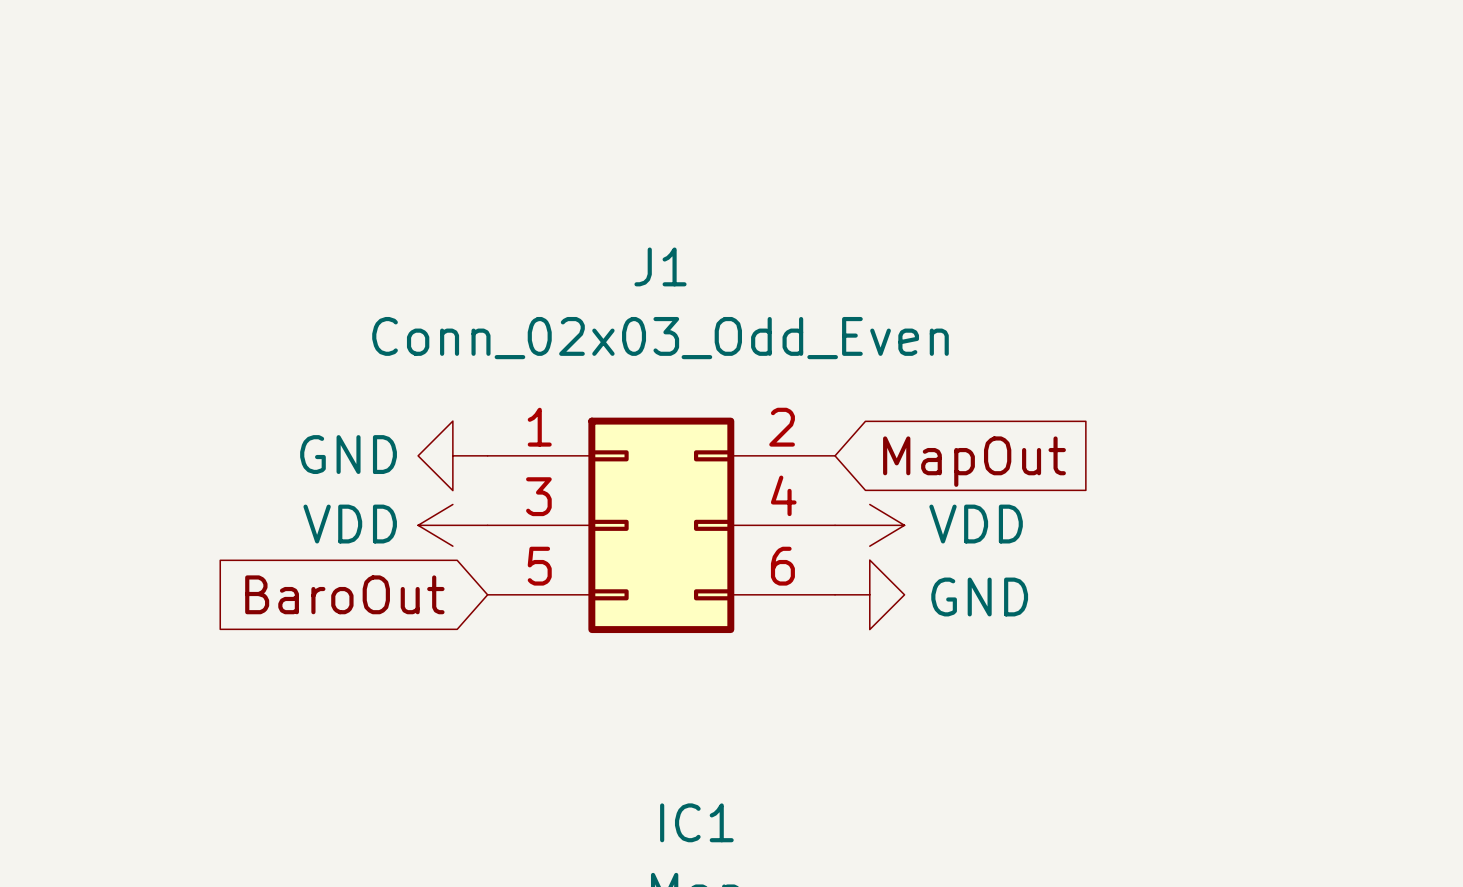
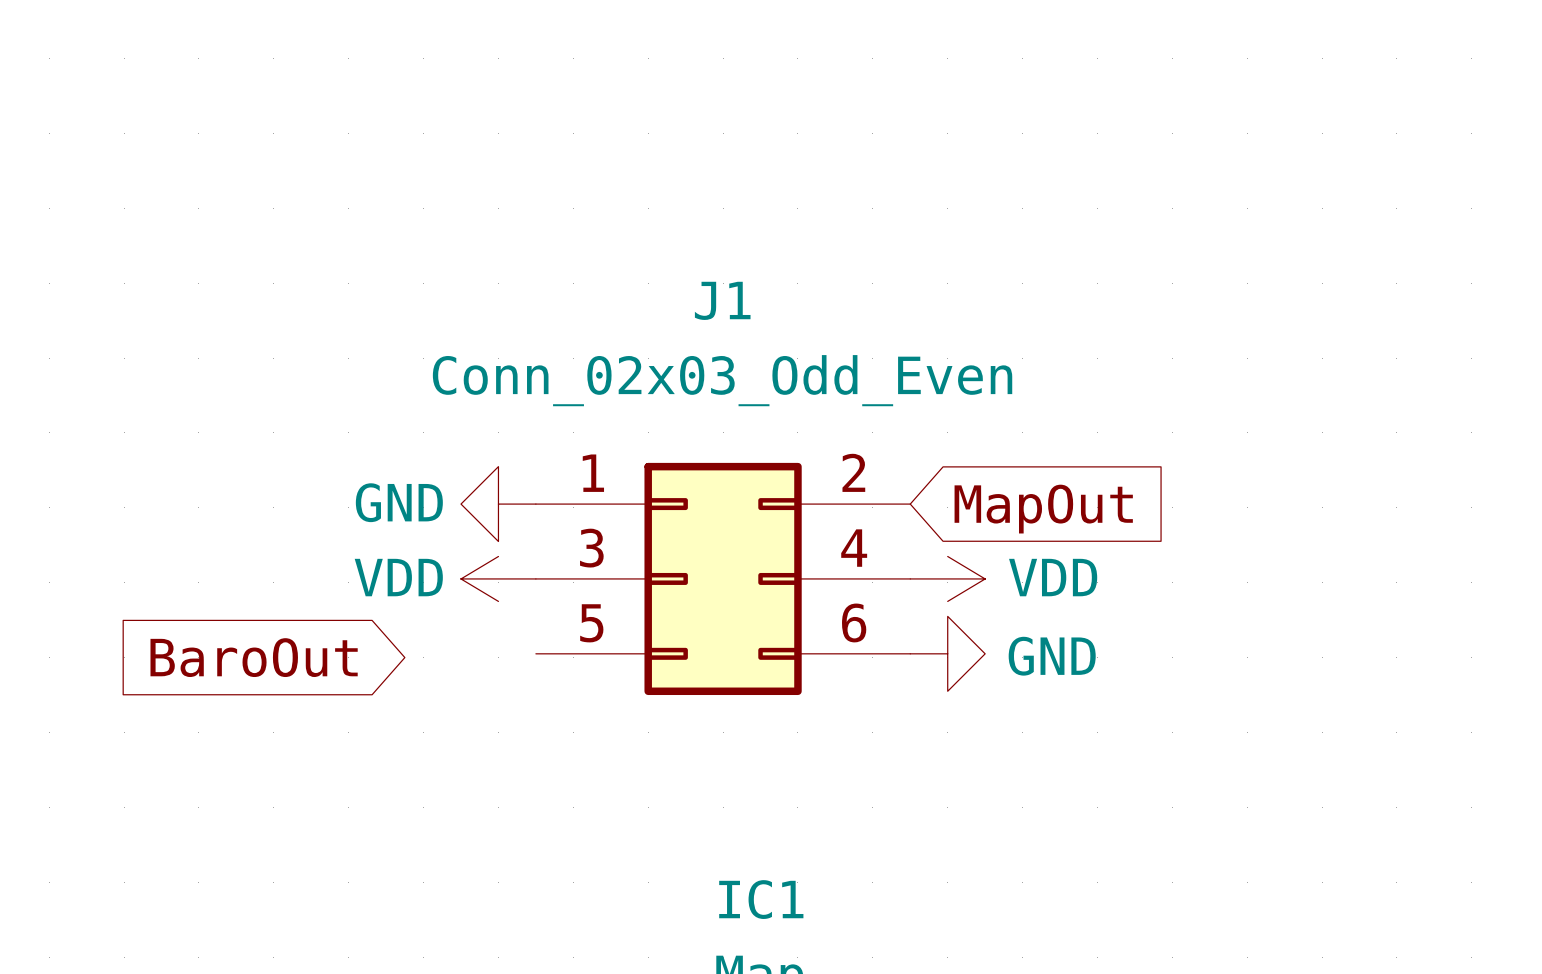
global label position: BaroOut (344, 594) -> BaroOut (254, 657)

